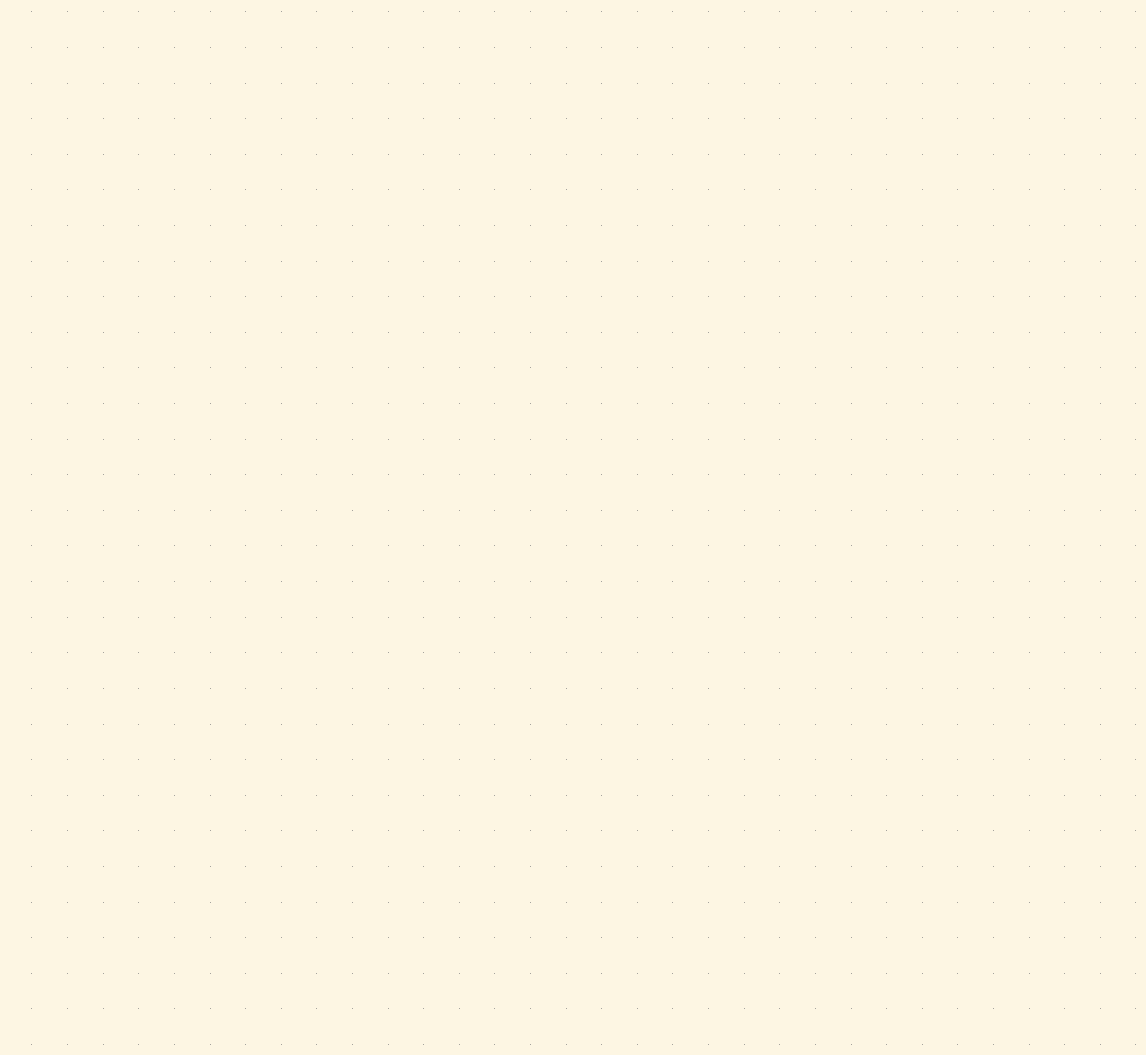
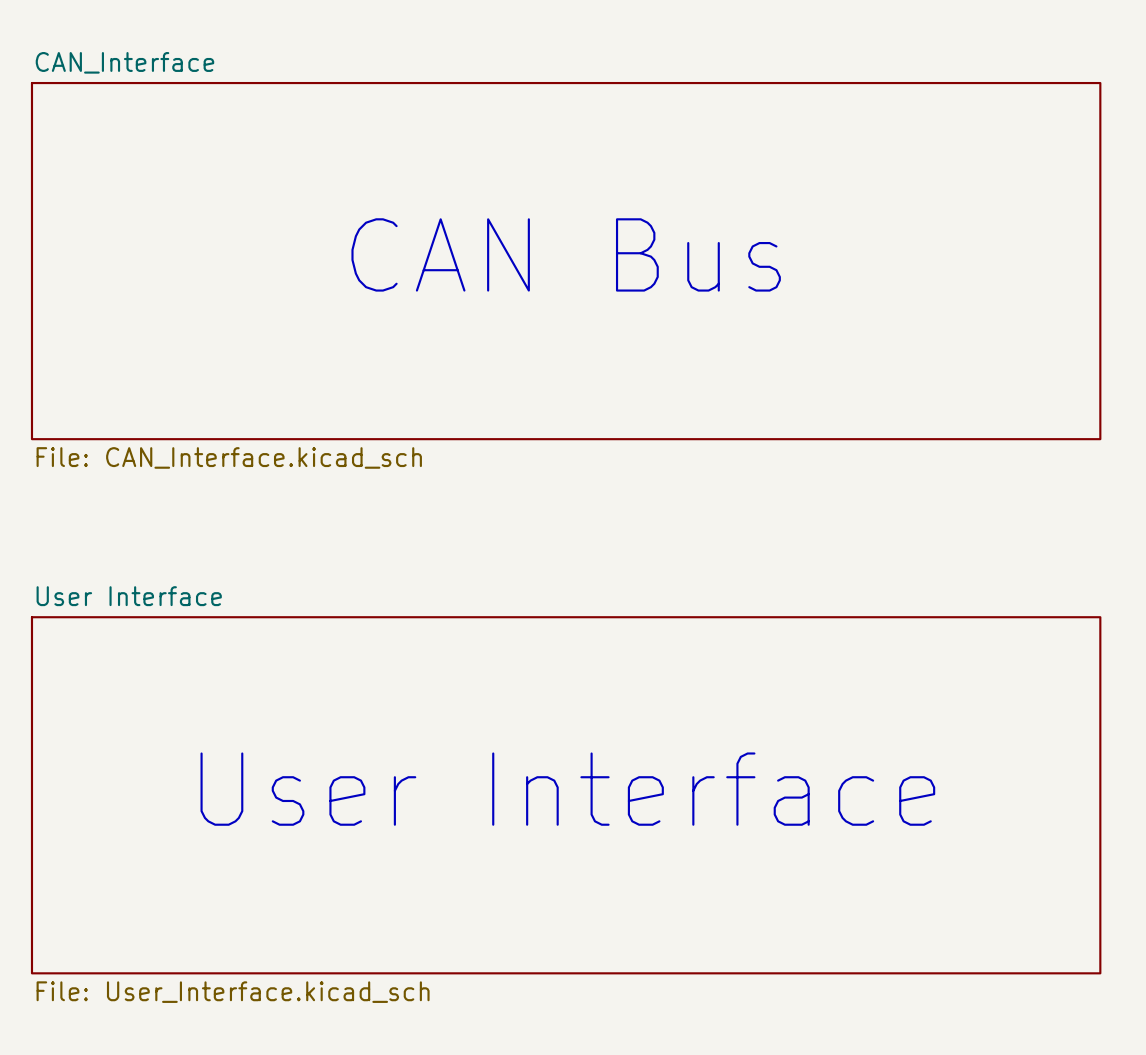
text: none -> CAN Bus (566, 254)
sheet CAN_Interface: none -> File: CAN_Interface.kicad_sch (566, 261)
text: none -> User Interface (567, 789)
sheet User Interface: none -> File: User_Interface.kicad_sch (566, 795)

